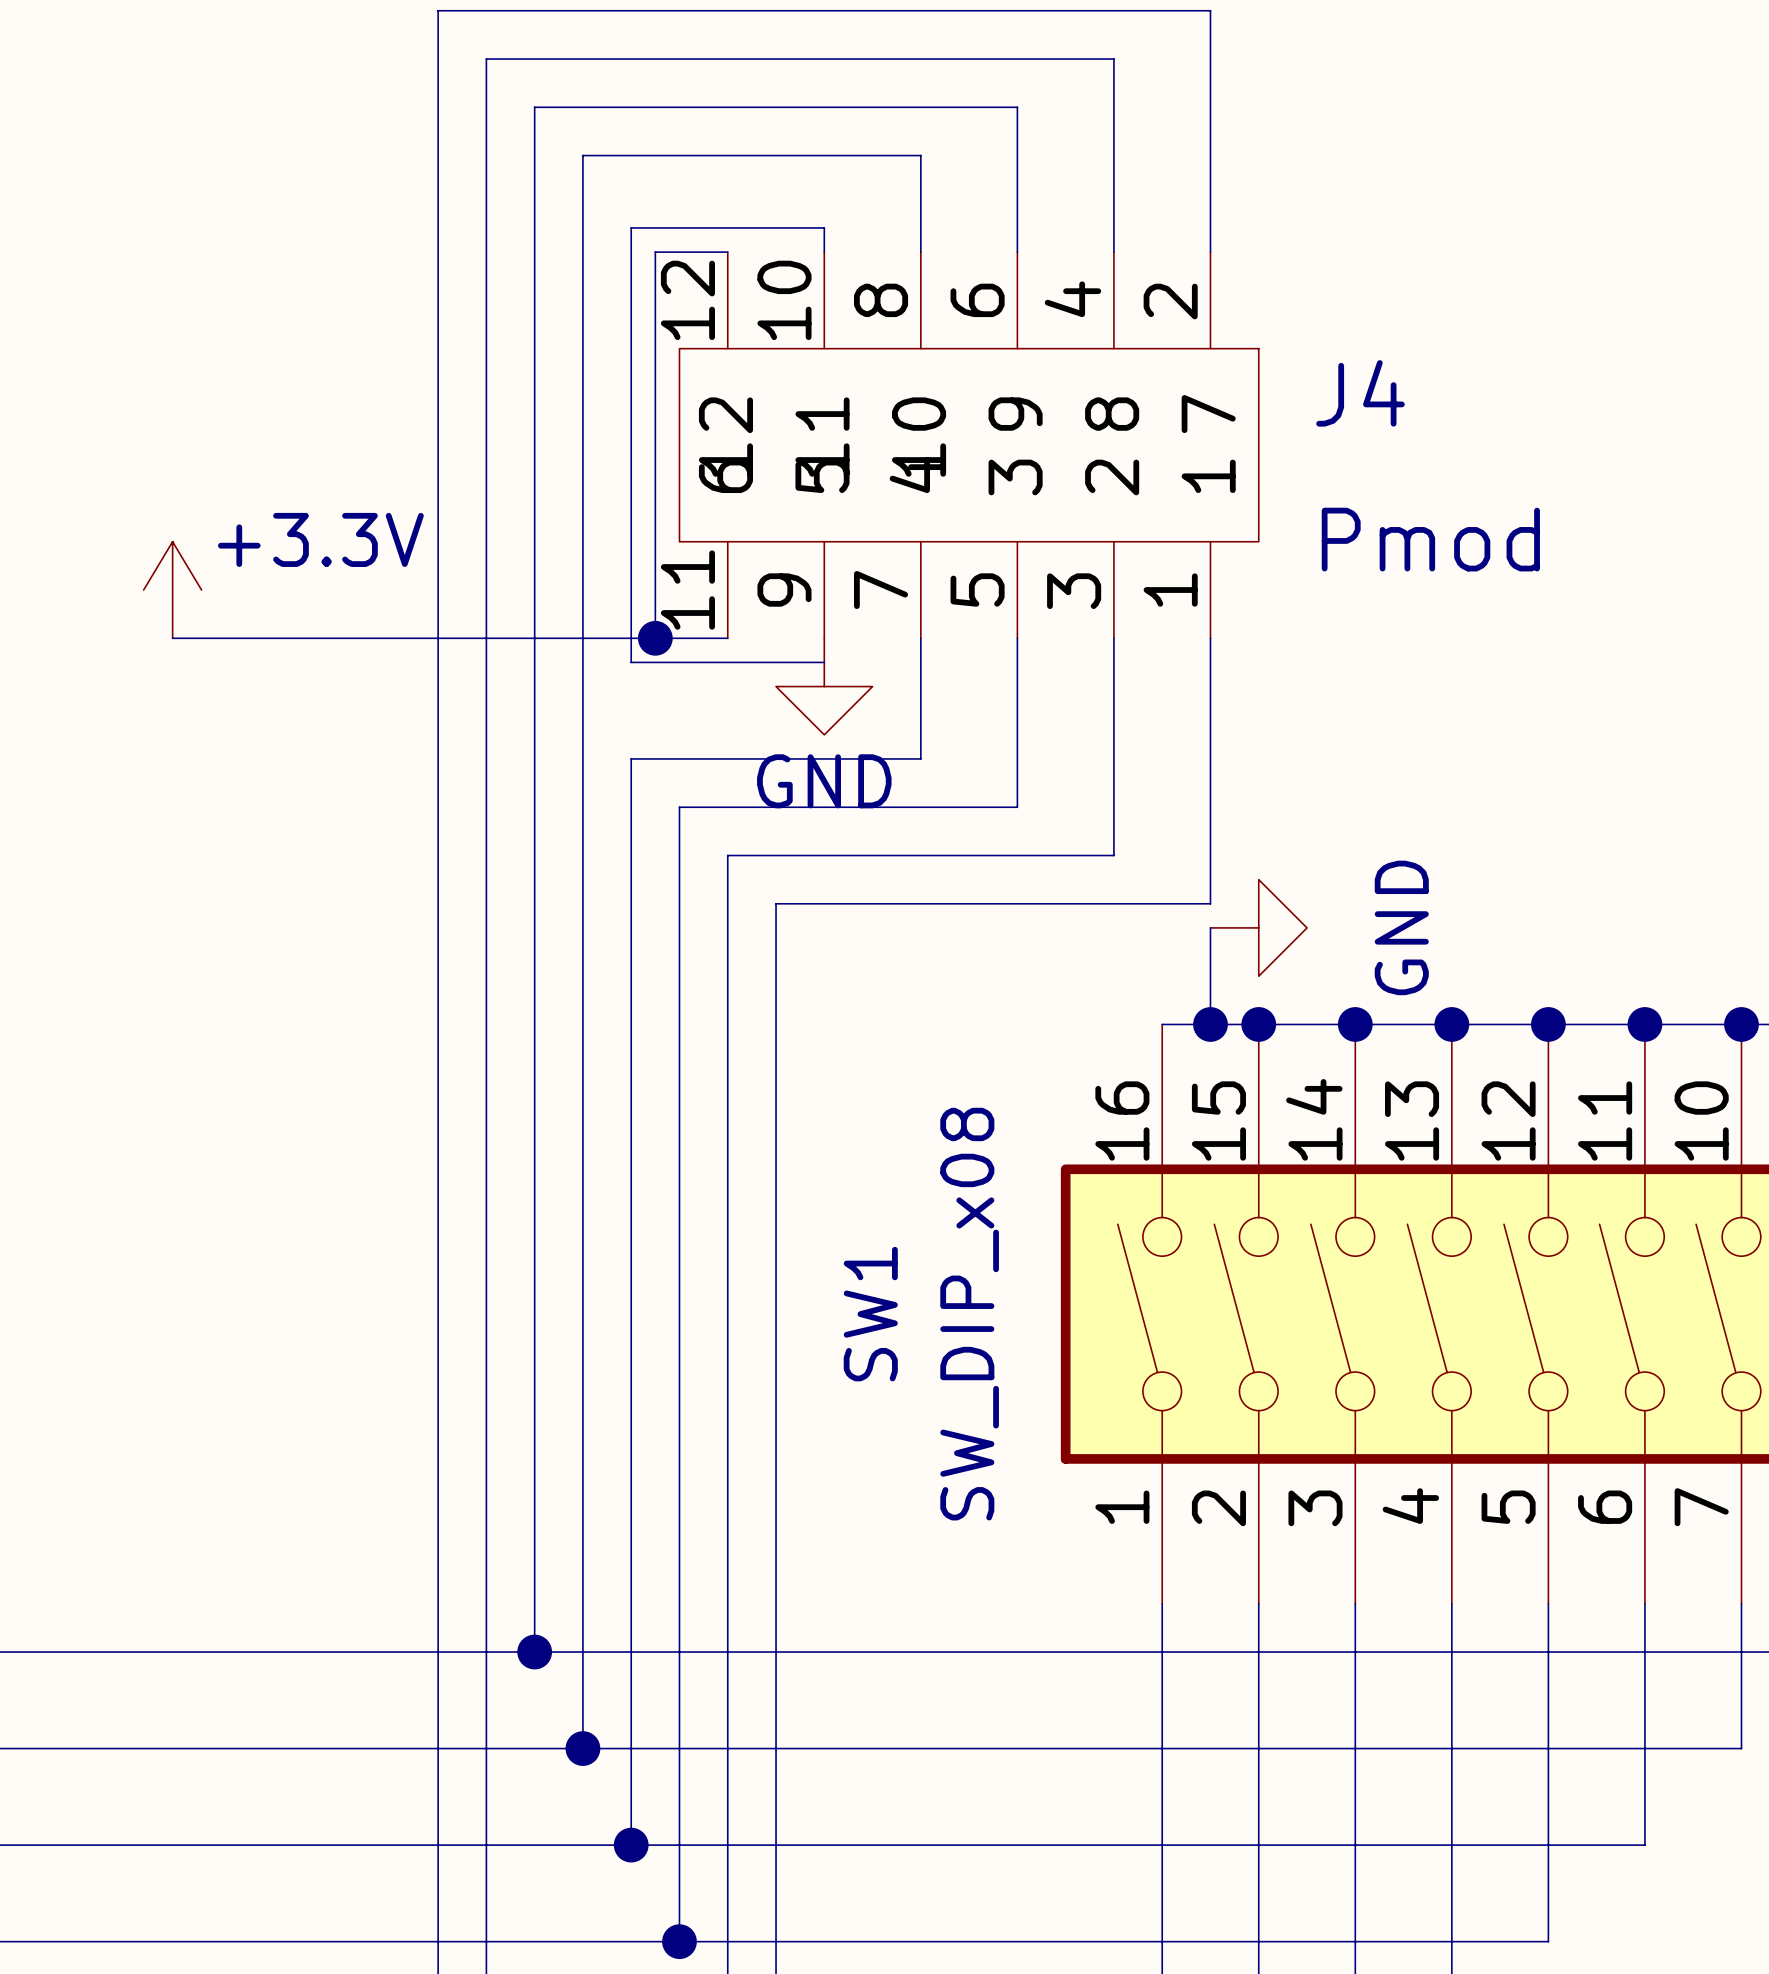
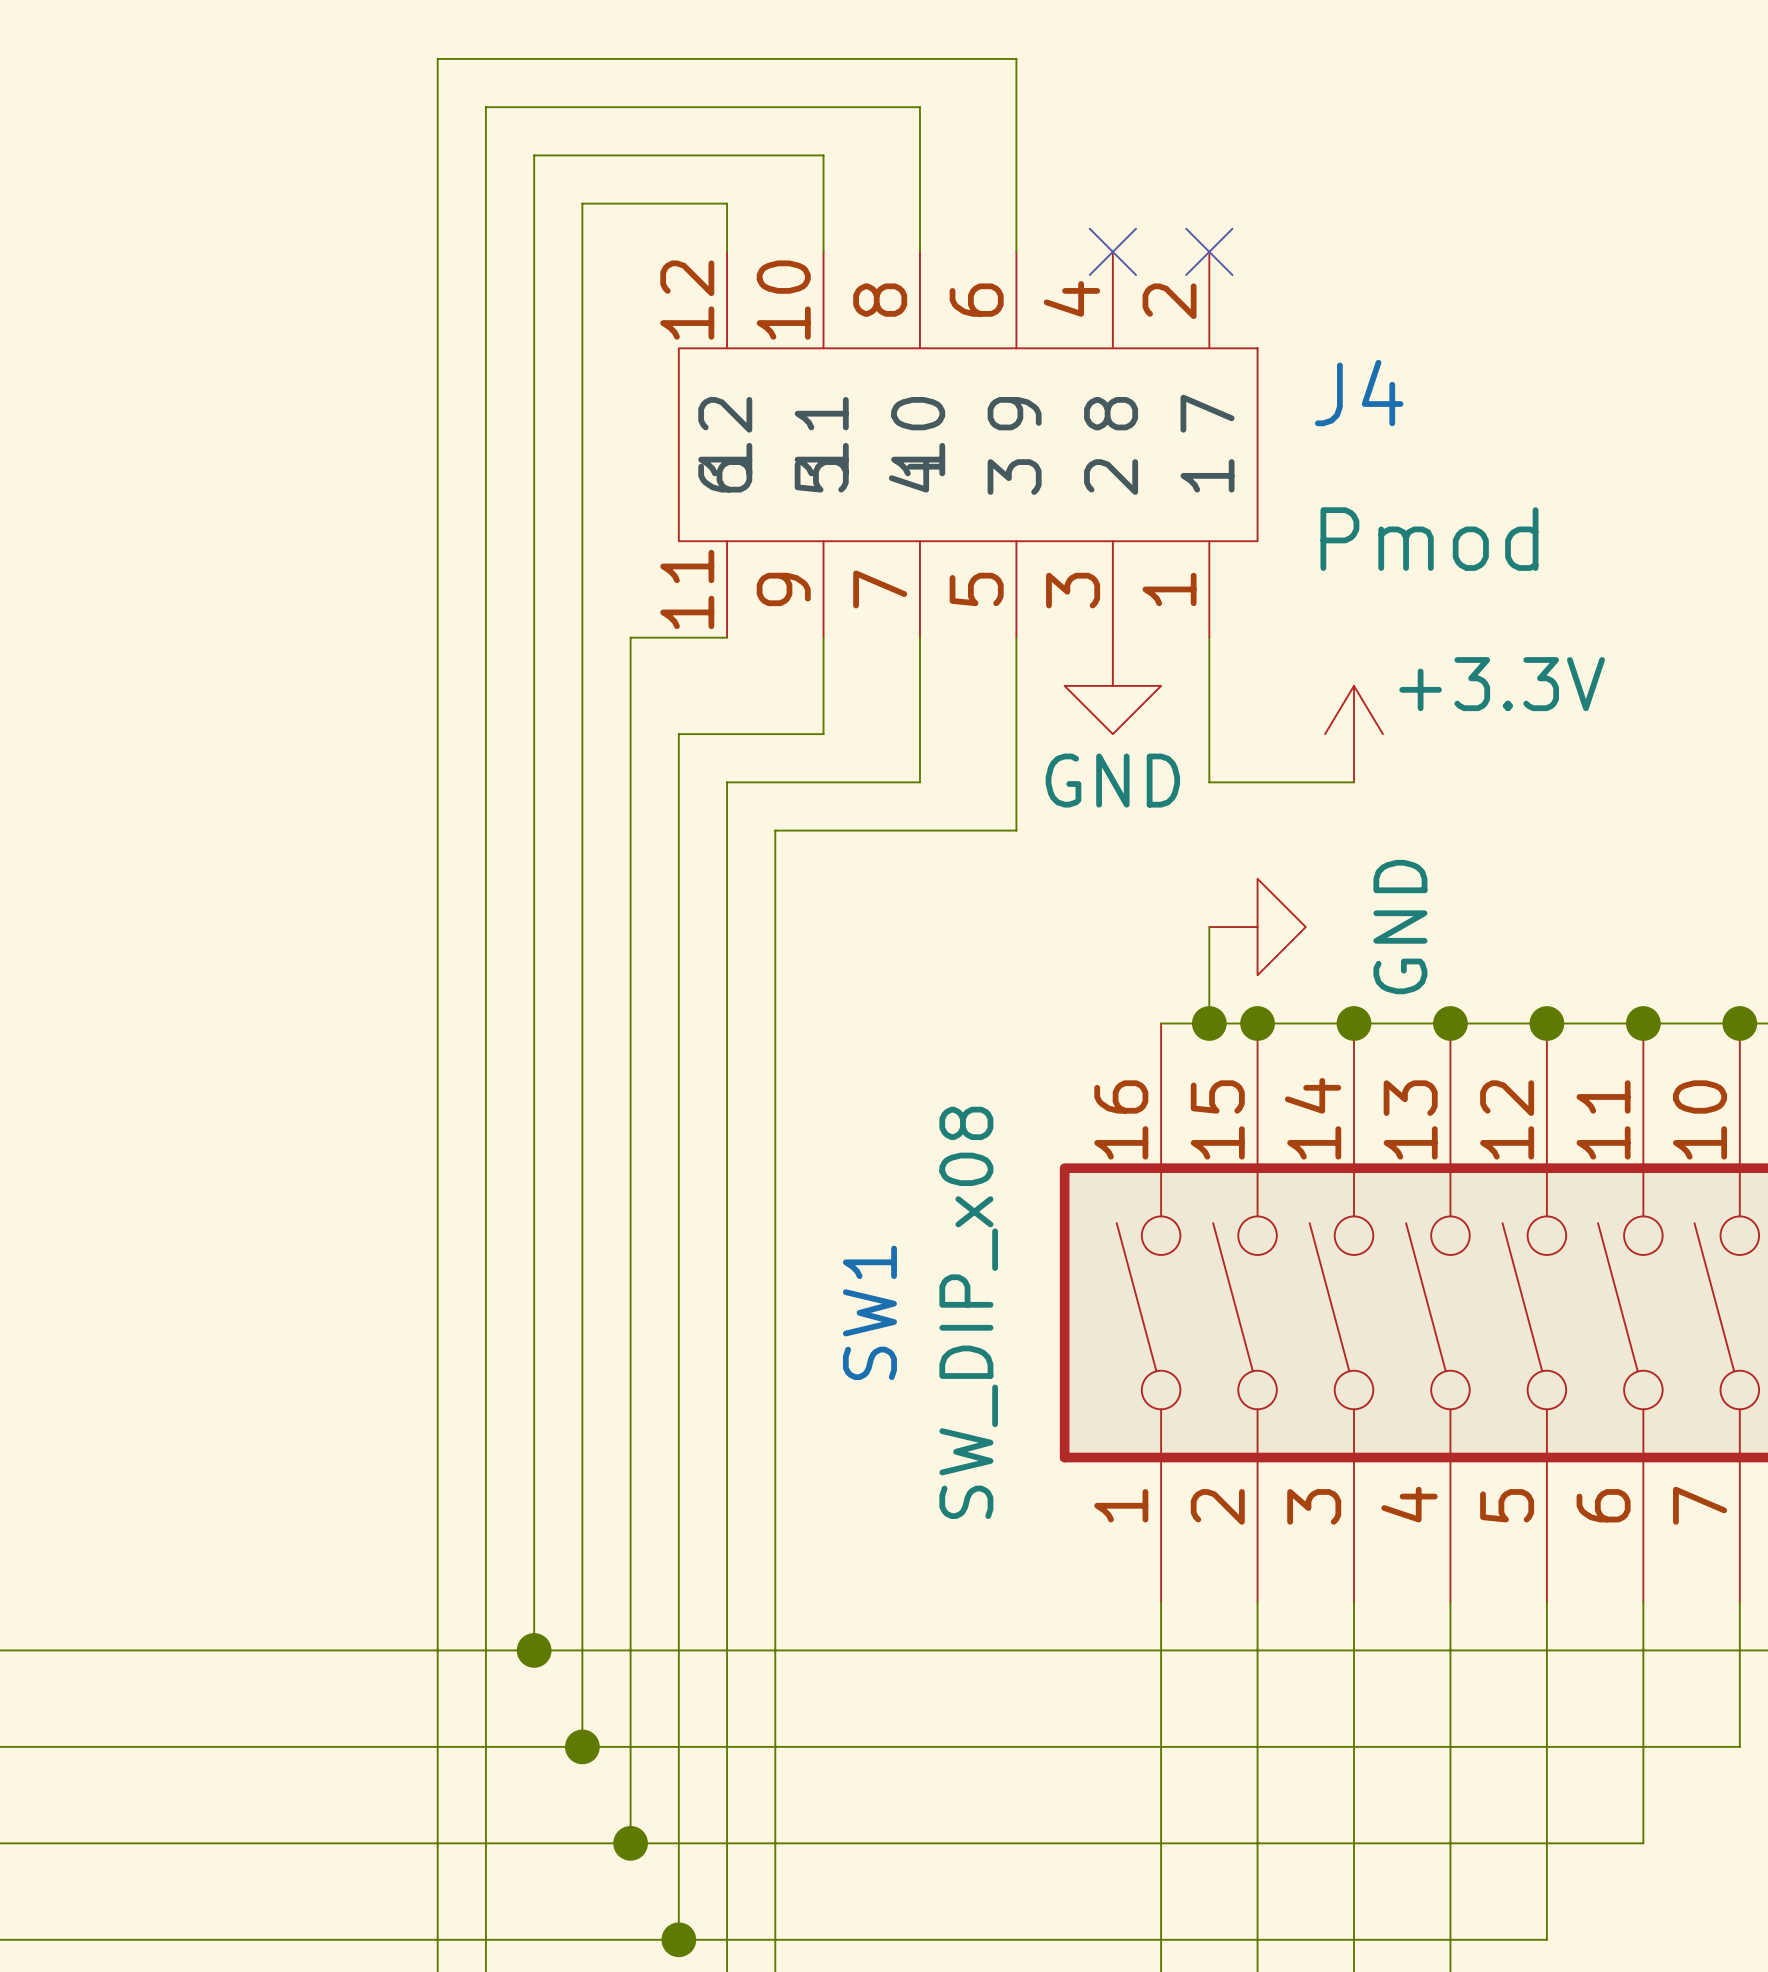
wire: (438, 59) (438, 10) (1210, 10) (1210, 252) -> (437, 58) (485, 58)
wire: (486, 59) (486, 107) -> (534, 107) (485, 107)
wire: (1017, 59) (1113, 59) (1113, 252) -> none
wire: (534, 107) (534, 155) -> (582, 155) (534, 155)
wire: (920, 107) (1017, 107) -> (1016, 58) (1016, 107)
wire: (582, 155) (582, 203) -> (727, 251) (727, 203) (582, 203)
wire: (824, 155) (920, 155) -> (919, 107) (919, 155)
wire: (824, 227) (631, 227) (631, 638) (172, 638) -> (823, 227) (823, 155)
wire: (727, 252) (655, 252) (655, 638) -> none
no-connect mark: none -> (1112, 251)
no-connect mark: none -> (1209, 251)
power symbol: +3.3V (172, 590) -> none
junction: (655, 638) -> none
wire: none -> (823, 637) (823, 734) (678, 734) (678, 806)
wire: (1113, 638) (1113, 855) (727, 855) -> none
wire: (631, 662) (824, 662) -> (630, 661) (630, 758)
power symbol position: GND (824, 686) -> GND (1112, 685)
power symbol: none -> +3.3V (1354, 734)
wire: (631, 758) (920, 758) -> (727, 854) (727, 782) (919, 782) (919, 758)
wire: (1210, 783) (1210, 903) (776, 903) -> (1209, 782) (1354, 782)
wire: (679, 807) (1017, 807) -> (775, 902) (775, 830) (1016, 830) (1016, 806)

